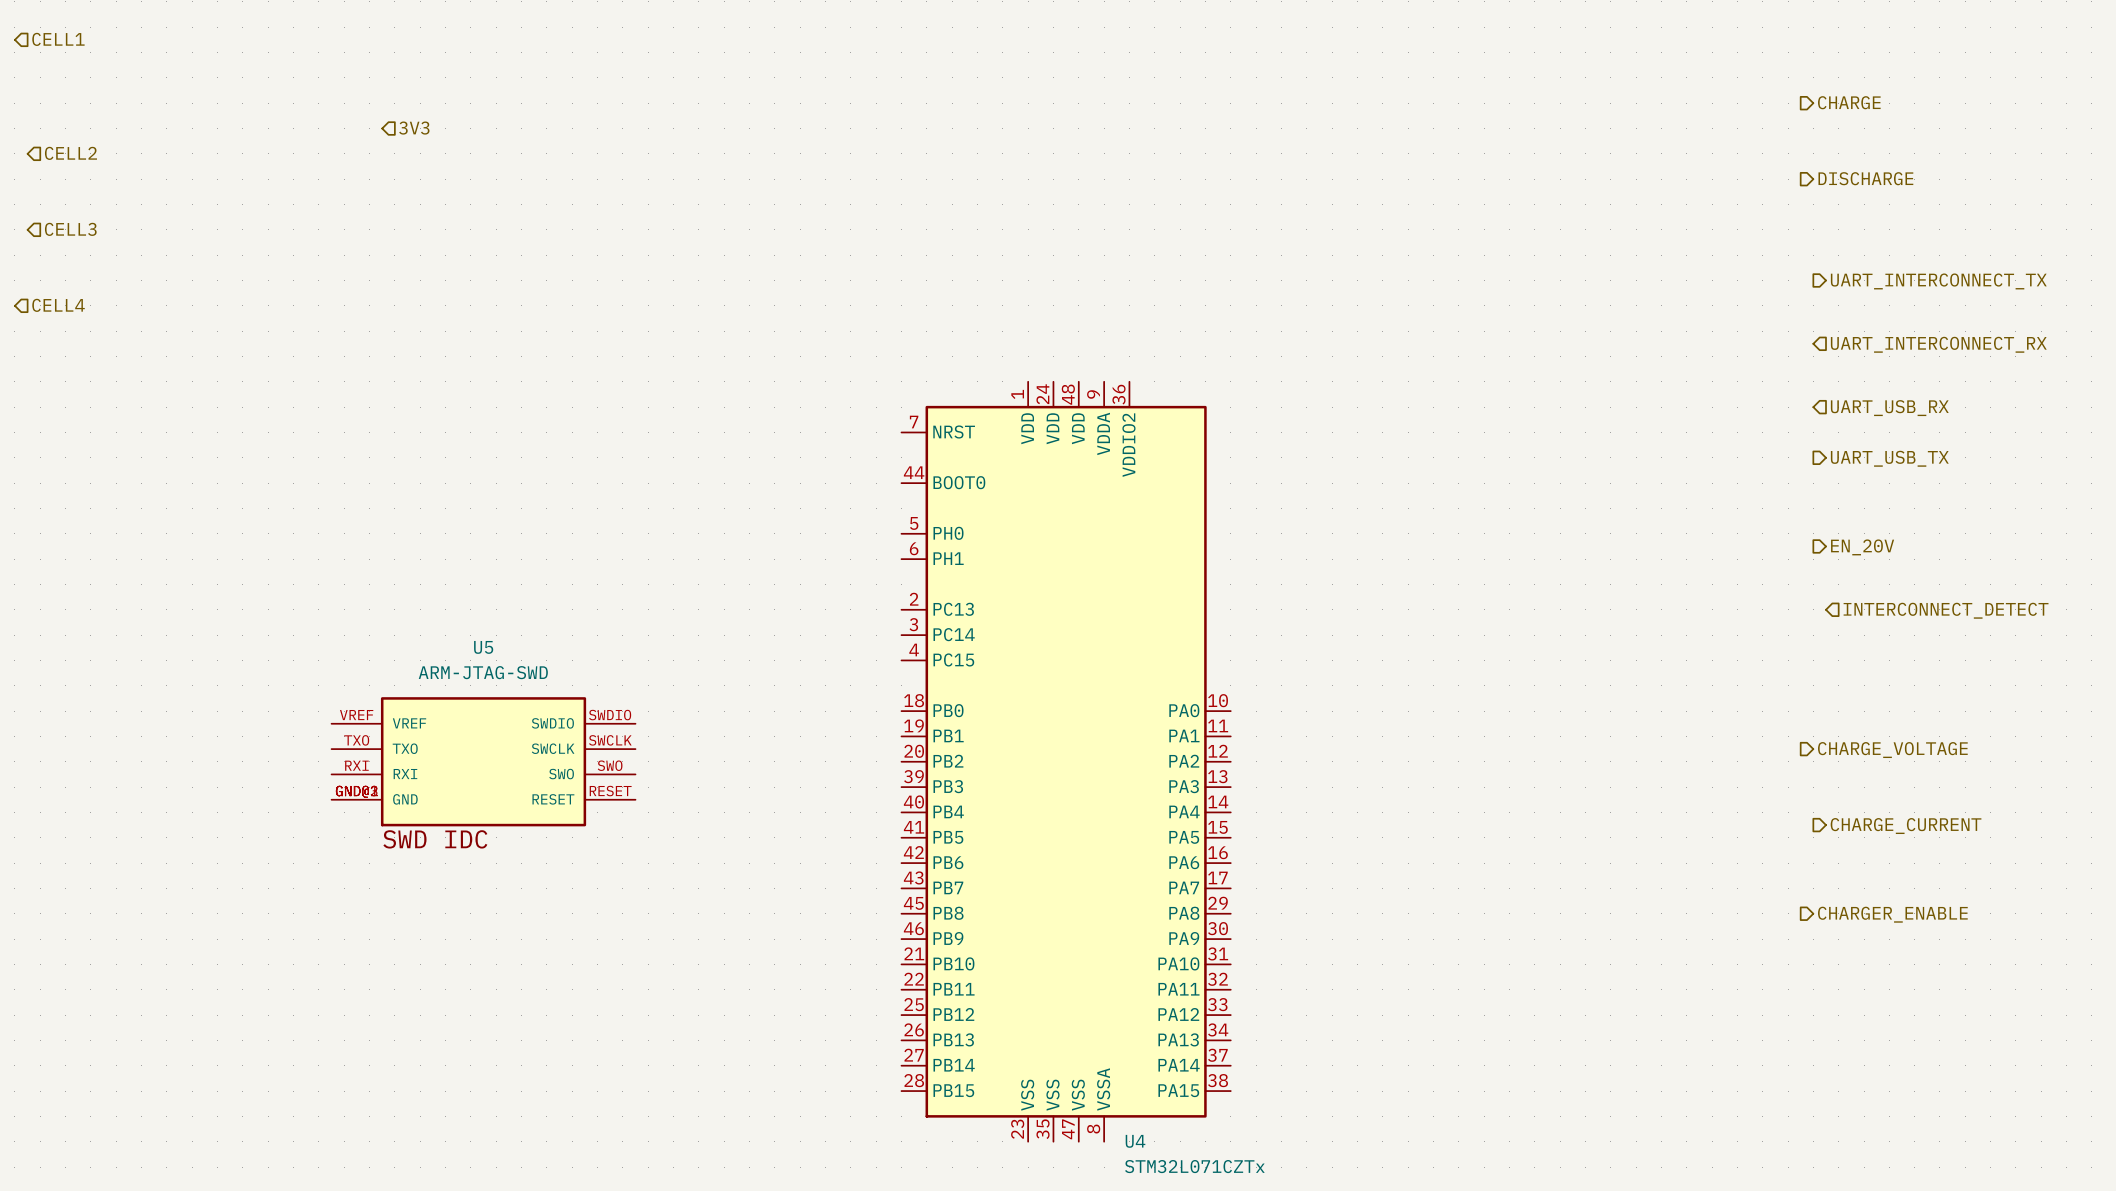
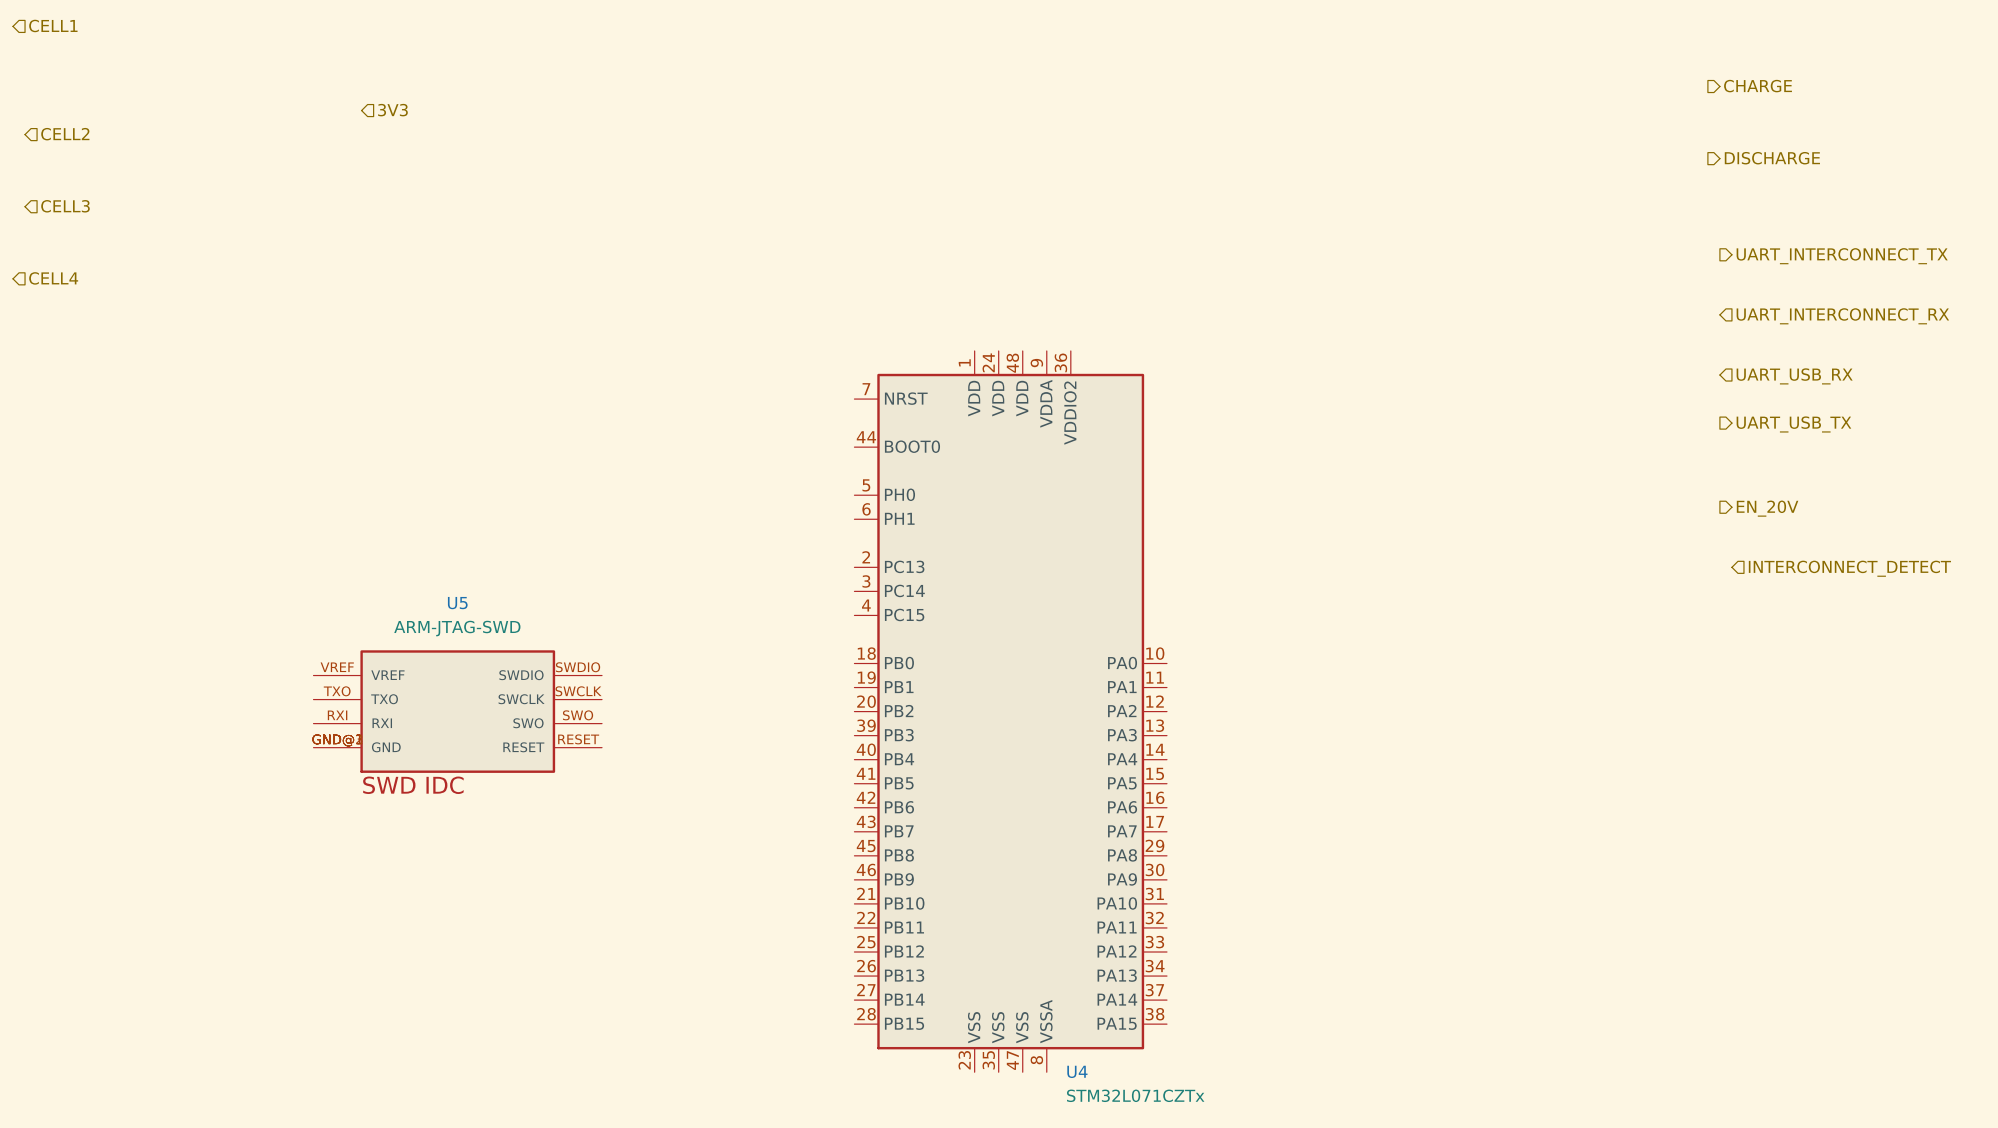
hierarchical label: CHARGE_VOLTAGE (1892, 750) -> none
hierarchical label: CHARGE_CURRENT (1906, 826) -> none
hierarchical label: CHARGER_ENABLE (1892, 914) -> none

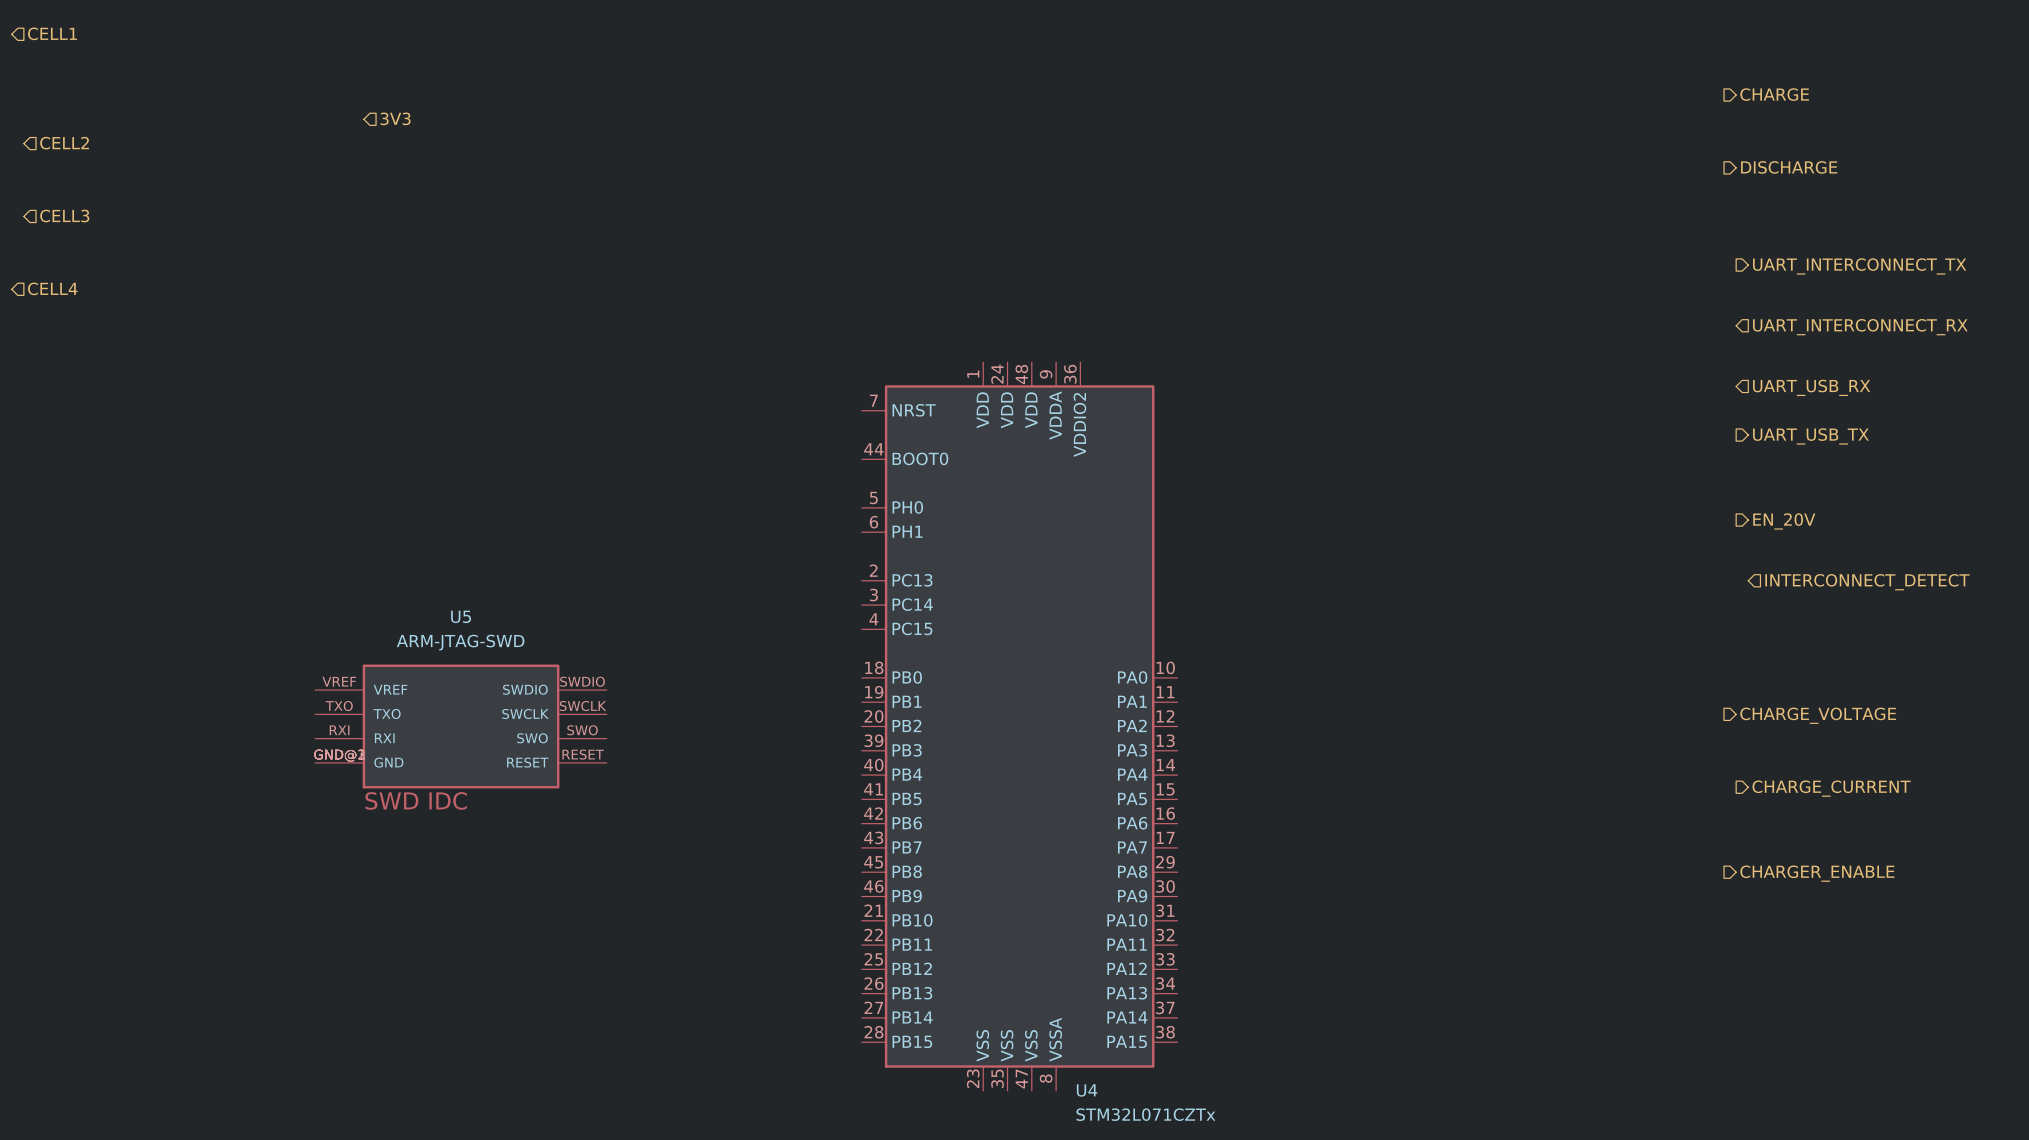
hierarchical label: none -> CHARGE_VOLTAGE (1818, 715)
hierarchical label: none -> CHARGE_CURRENT (1831, 788)
hierarchical label: none -> CHARGER_ENABLE (1817, 873)

